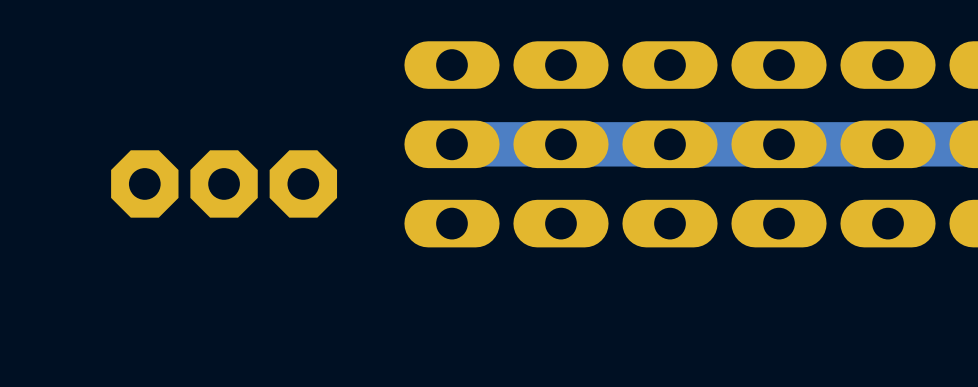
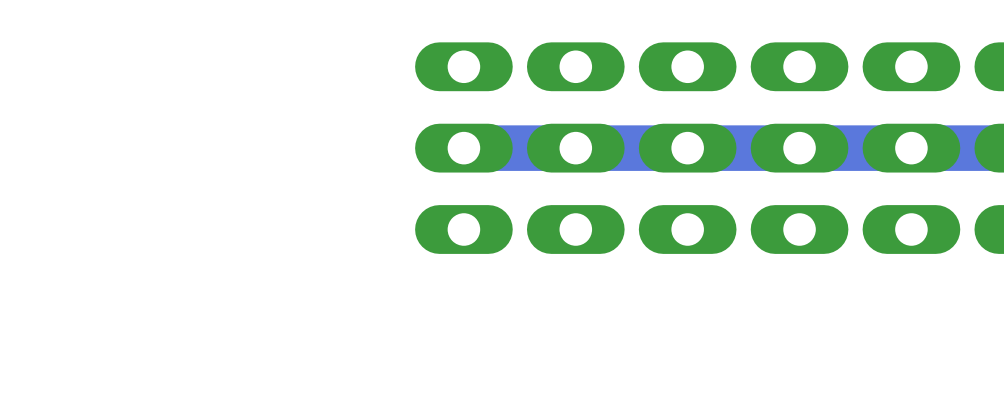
part: (144, 183) -> none
part: (224, 183) -> none
part: (303, 183) -> none

